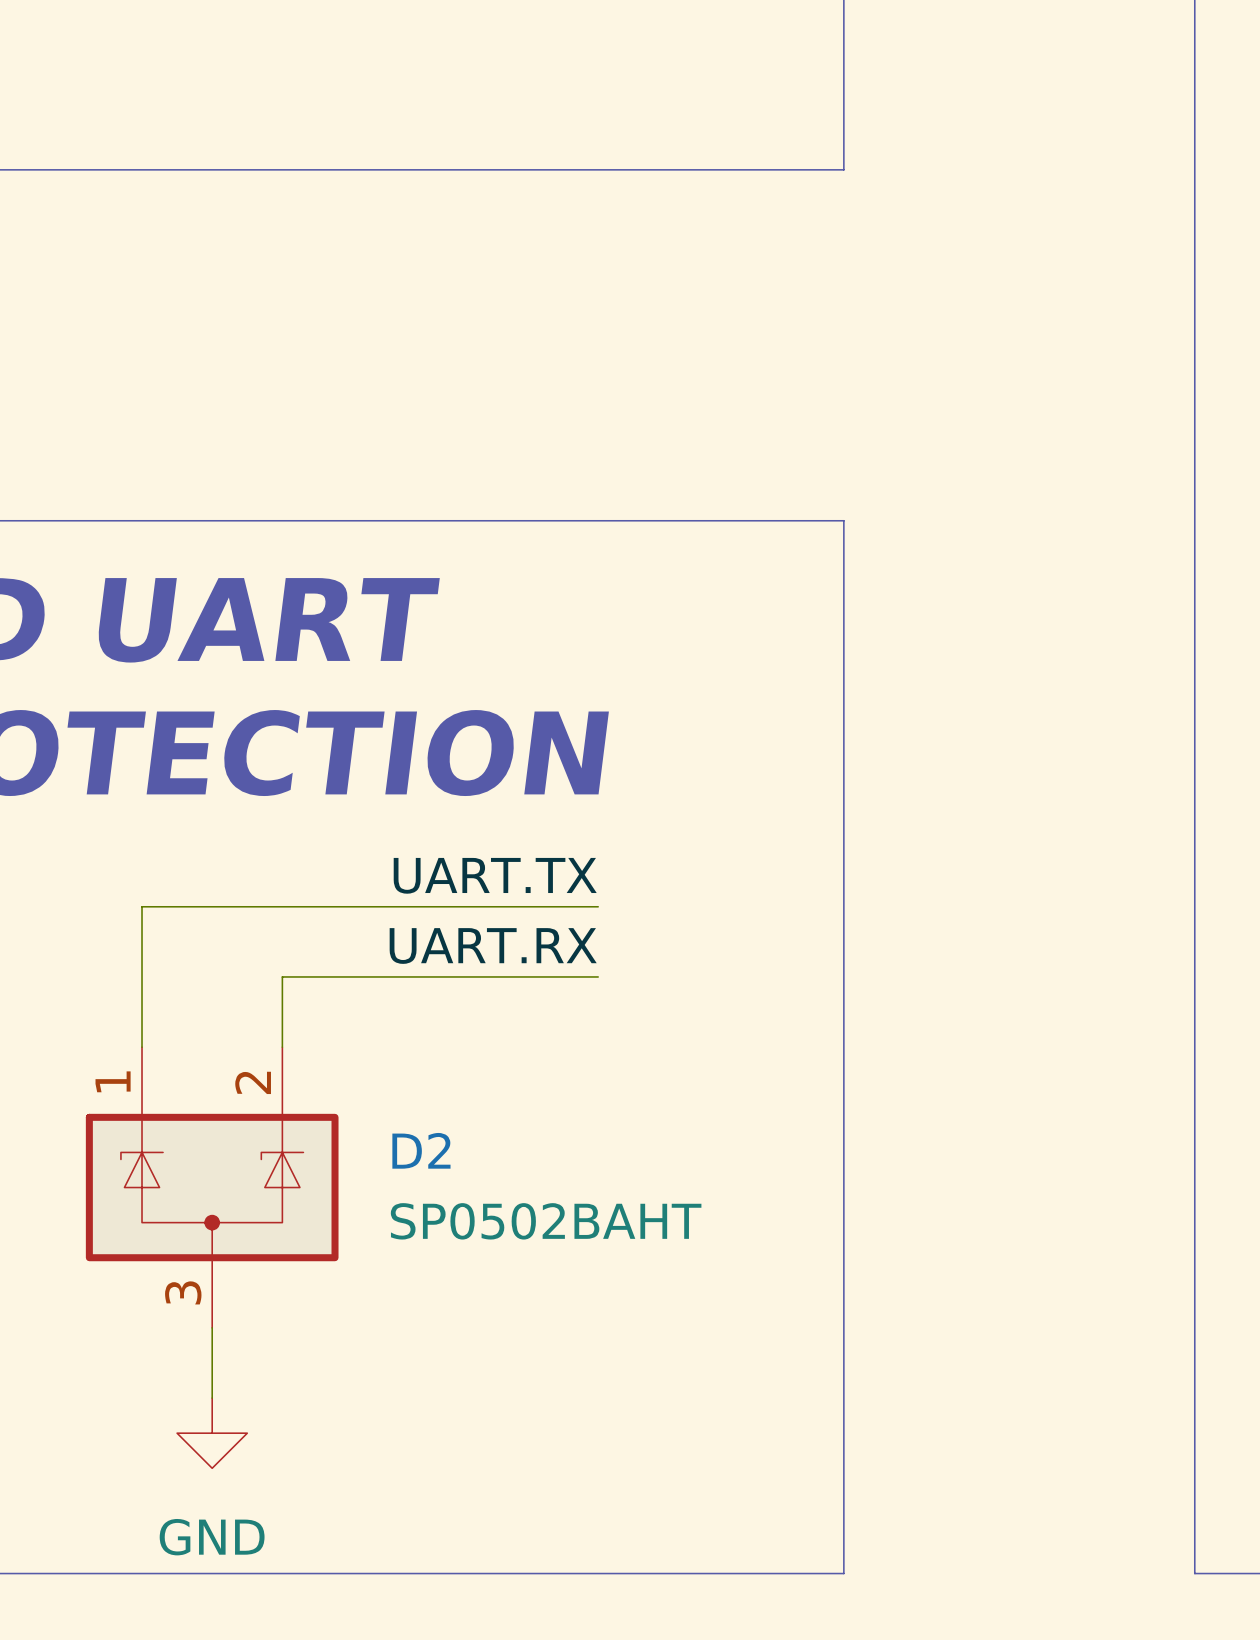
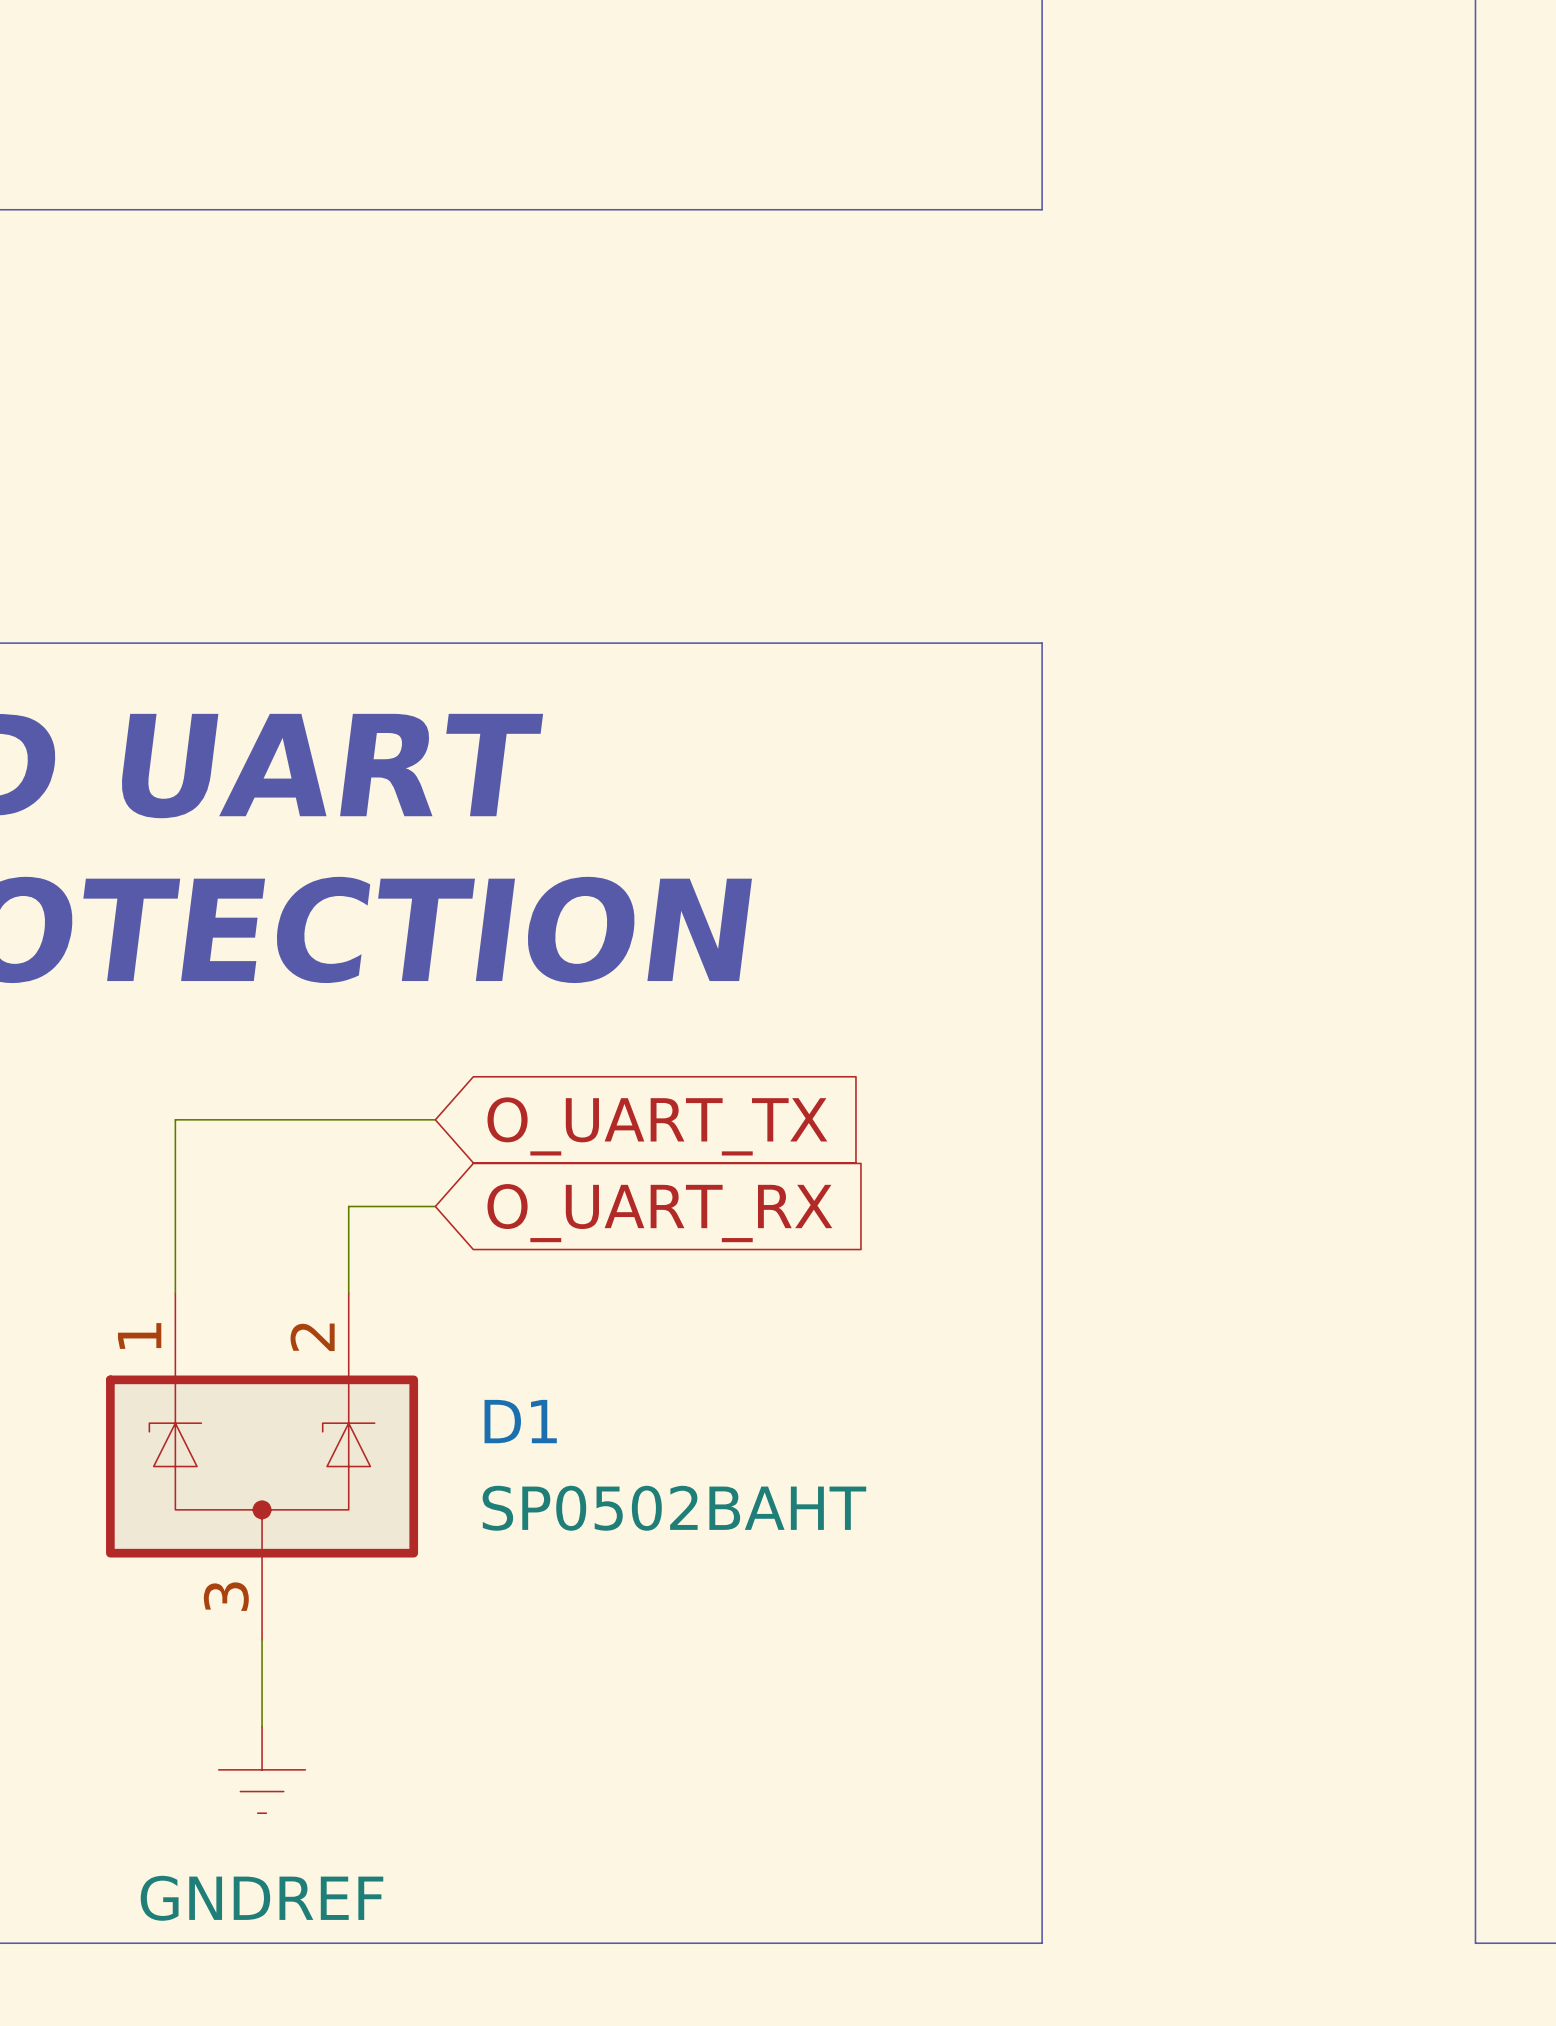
label: UART.TX (495, 875) -> none
wire: (352, 906) (598, 906) -> none
global label: none -> O_UART_TX (657, 1126)
label: UART.RX (493, 946) -> none
wire: (352, 976) (598, 976) -> none
global label: none -> O_UART_RX (659, 1213)
D2 name: D2 (421, 1150) -> D1 (520, 1421)
power symbol: GND (212, 1433) -> GNDREF (262, 1769)

